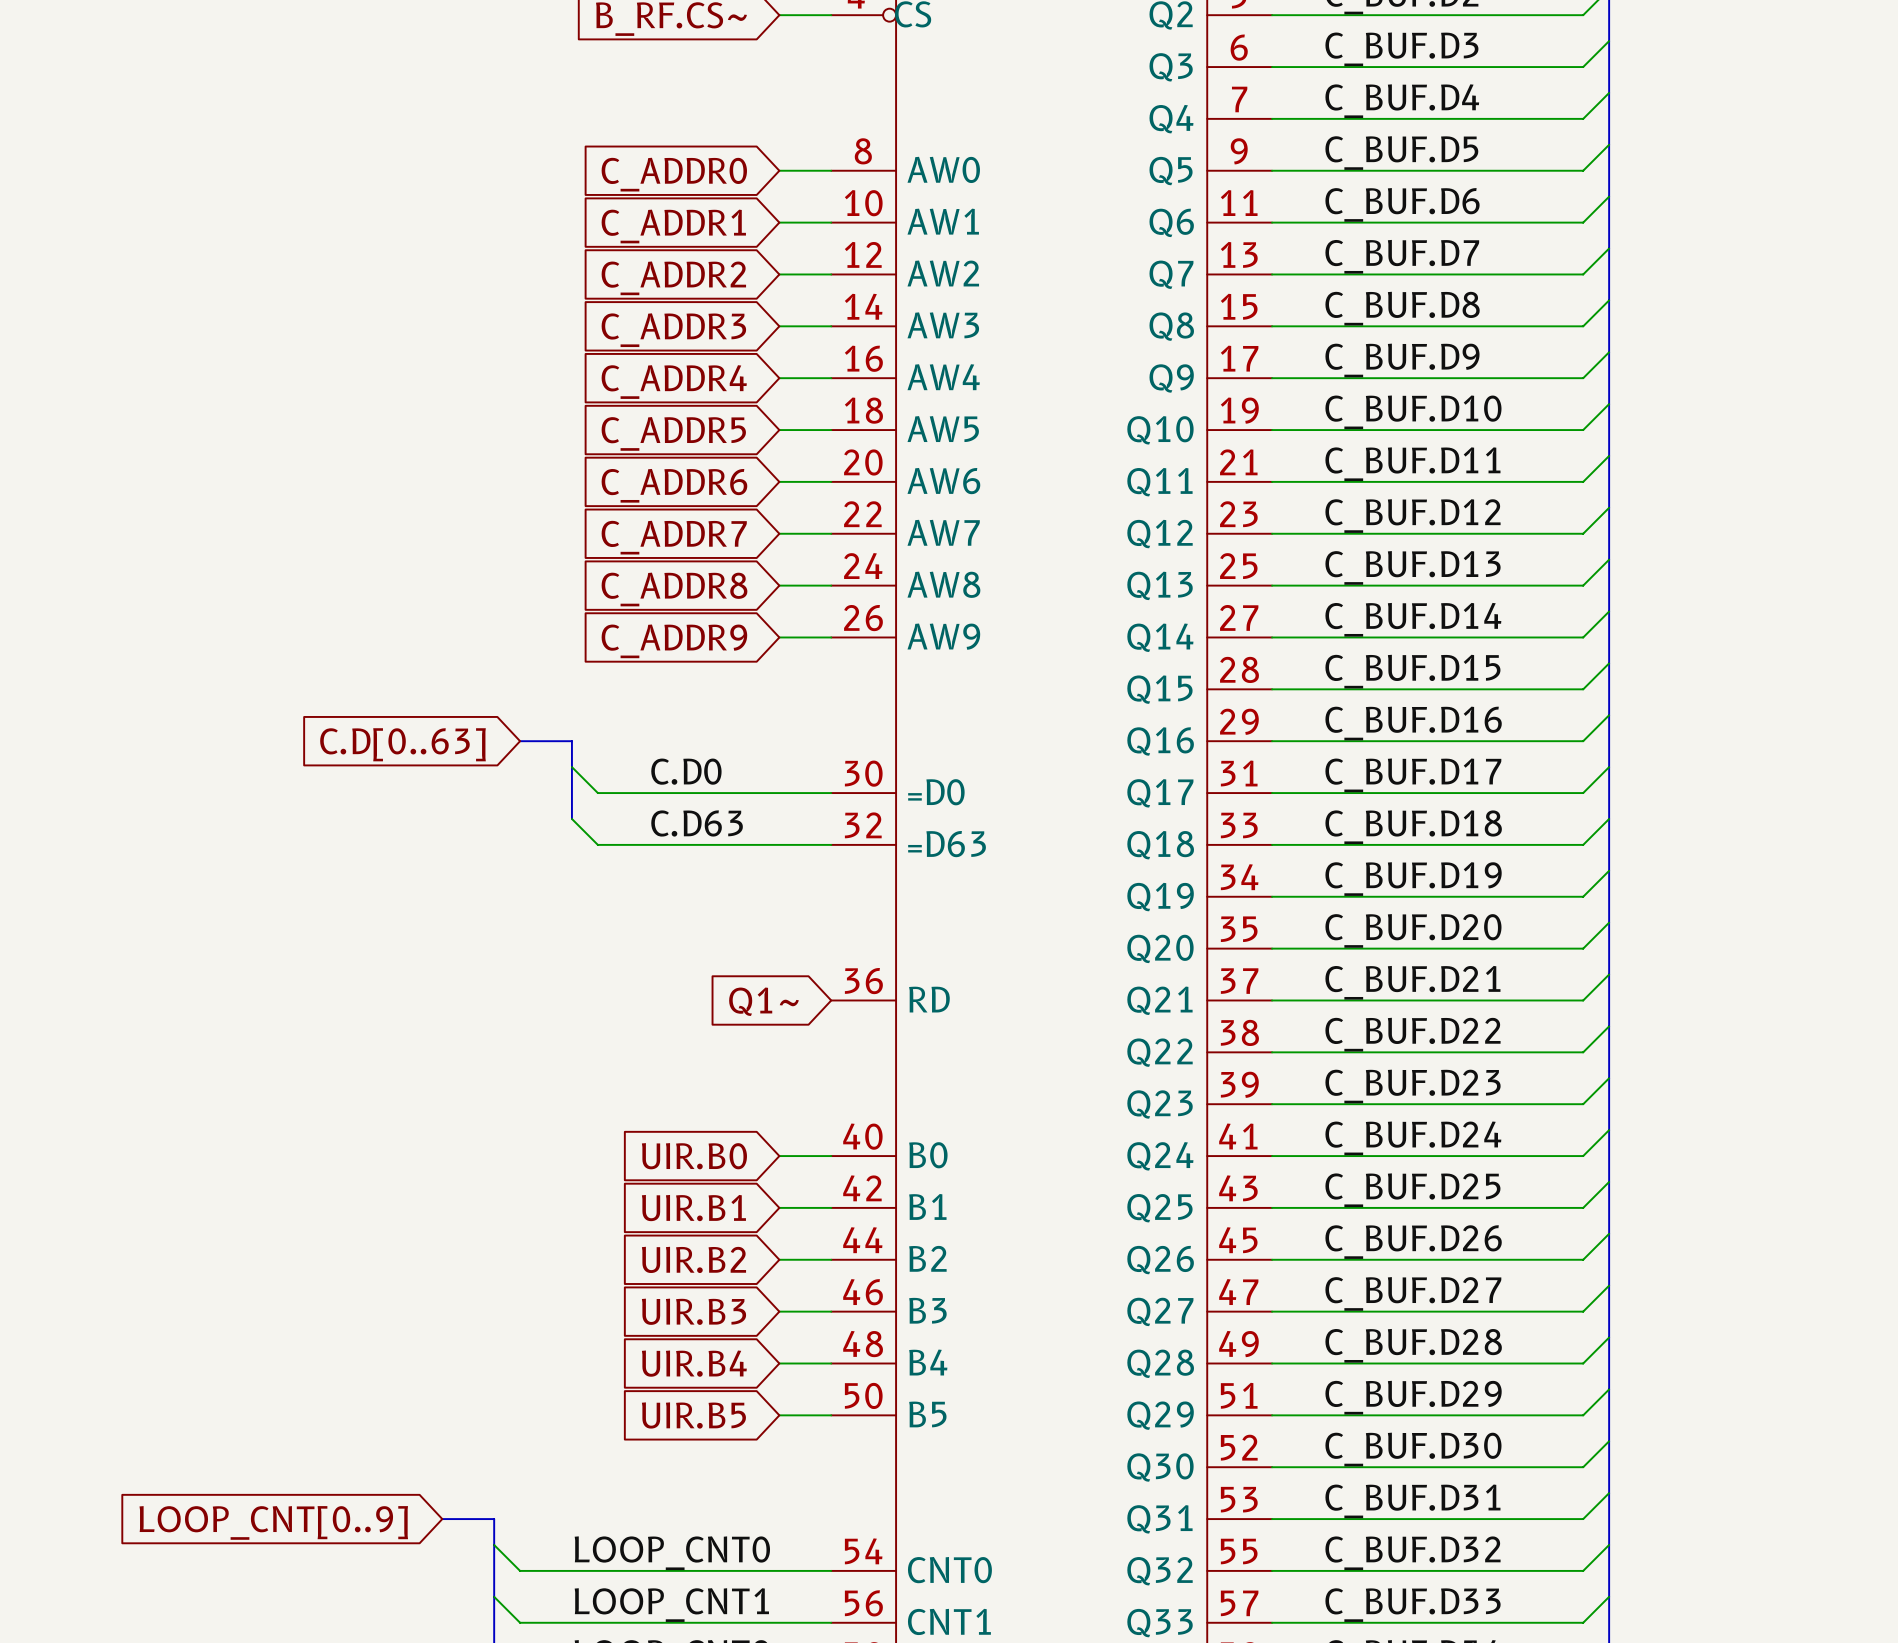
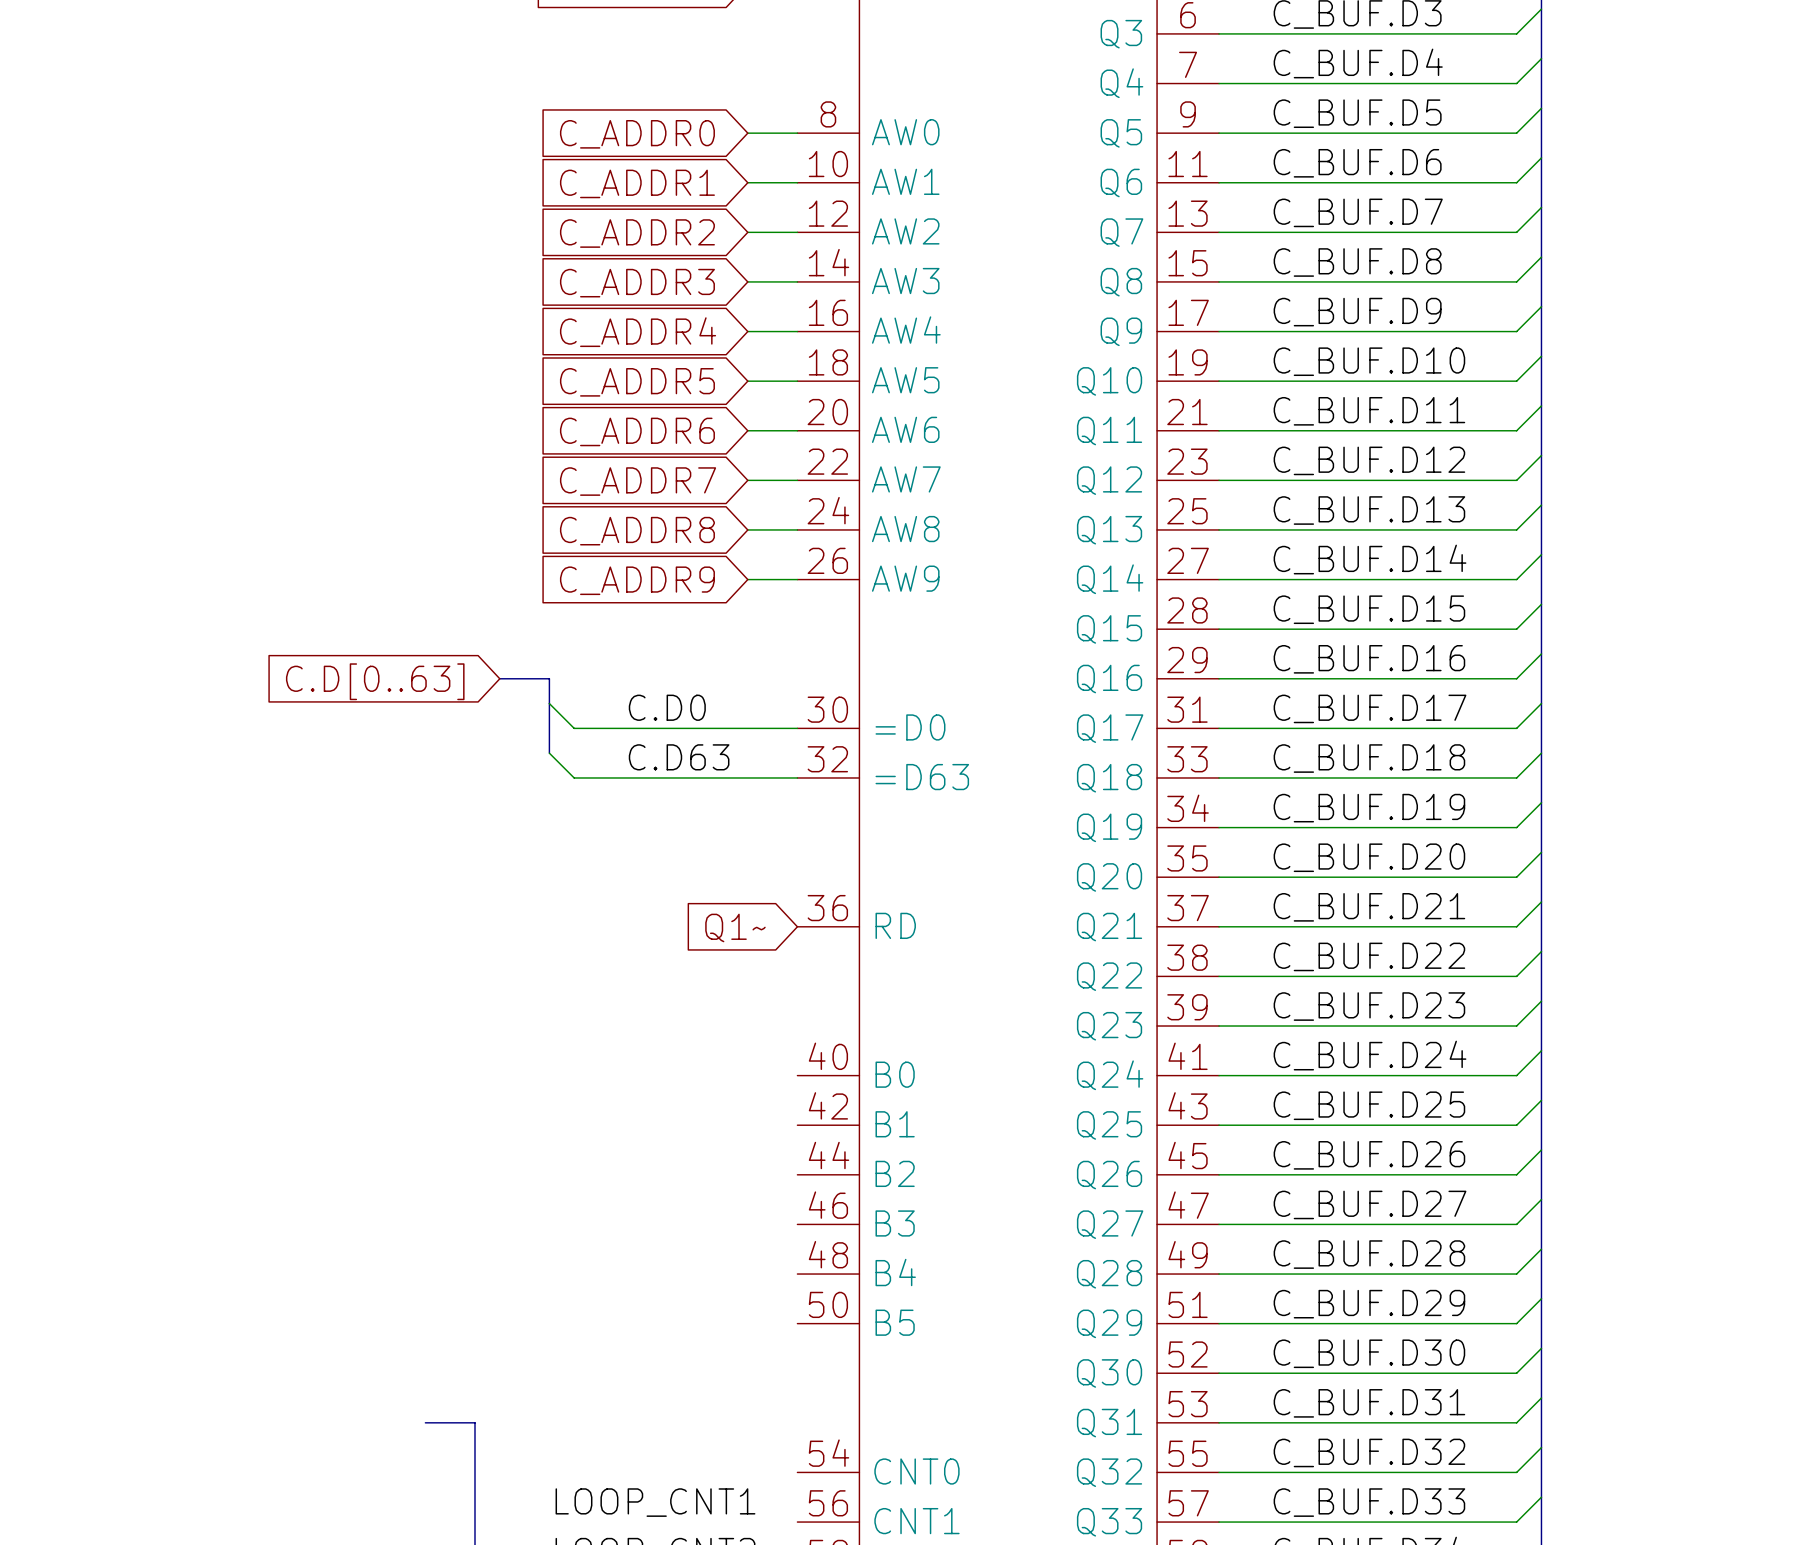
global label: UIR.B0 (694, 1156) -> none
wire: (779, 1156) (831, 1156) -> none
wire: (779, 1207) (831, 1207) -> none
global label: UIR.B1 (693, 1208) -> none
global label: UIR.B2 (693, 1259) -> none
wire: (779, 1259) (831, 1259) -> none
global label: UIR.B3 (693, 1311) -> none
wire: (779, 1311) (831, 1311) -> none
global label: UIR.B4 (694, 1363) -> none
wire: (779, 1363) (831, 1363) -> none
global label: UIR.B5 (693, 1415) -> none
wire: (779, 1415) (831, 1415) -> none
global label: LOOP_CNT[0..9] (273, 1522) -> none
wire: (494, 1545) (520, 1570) (831, 1570) -> none
label: LOOP_CNT0 (672, 1553) -> none
wire: (494, 1596) (520, 1622) (831, 1622) -> none

